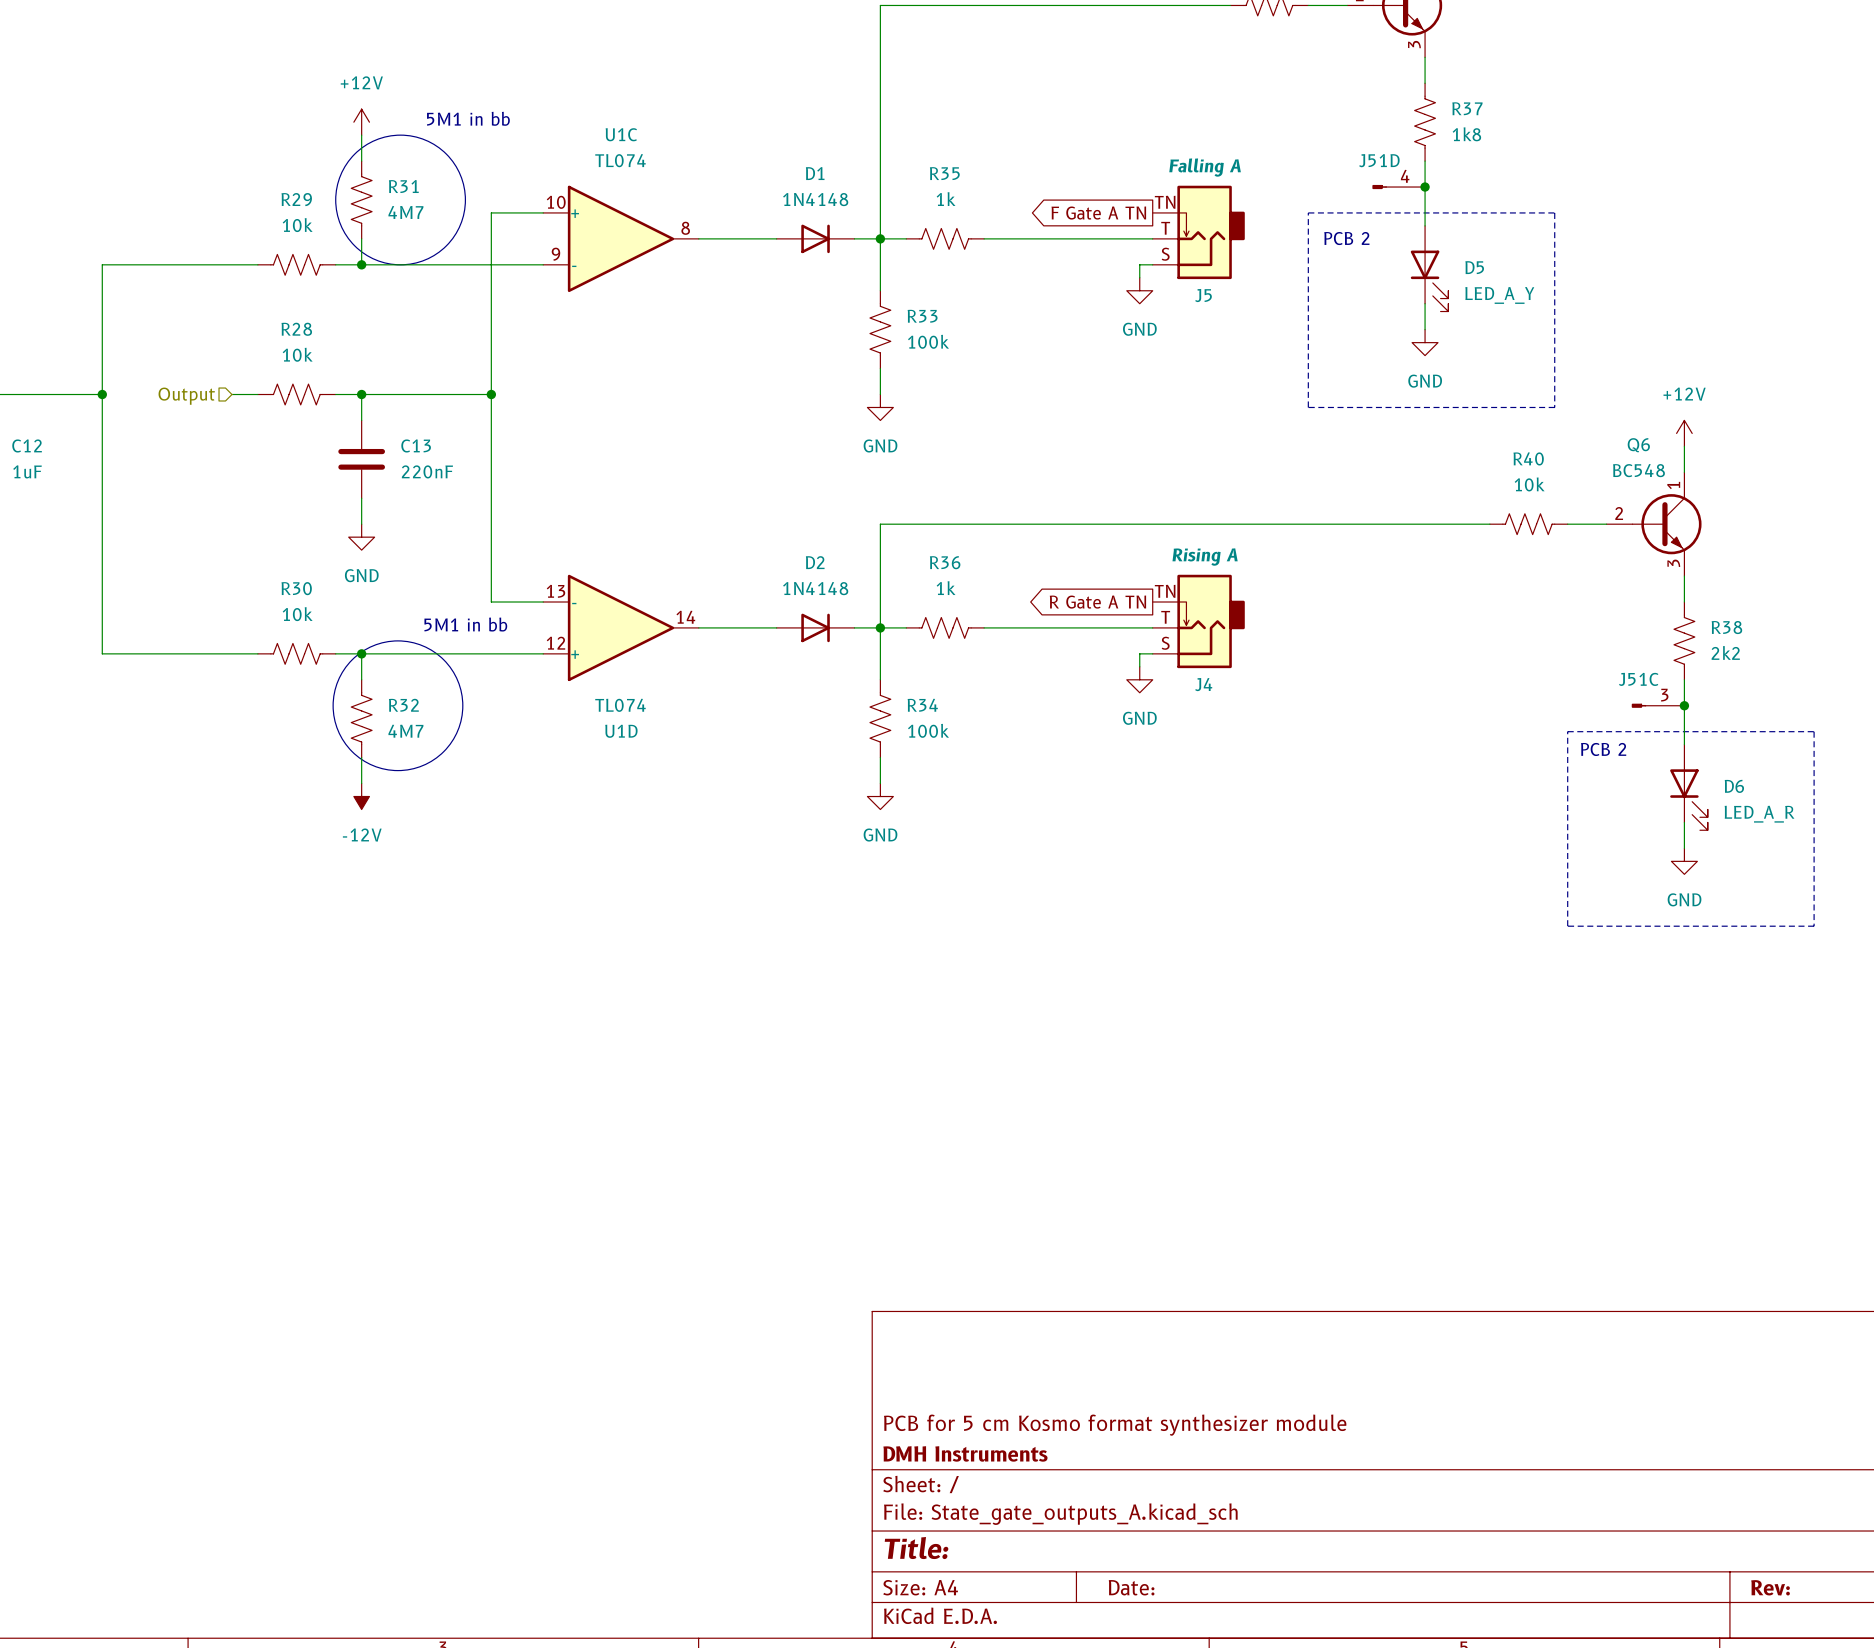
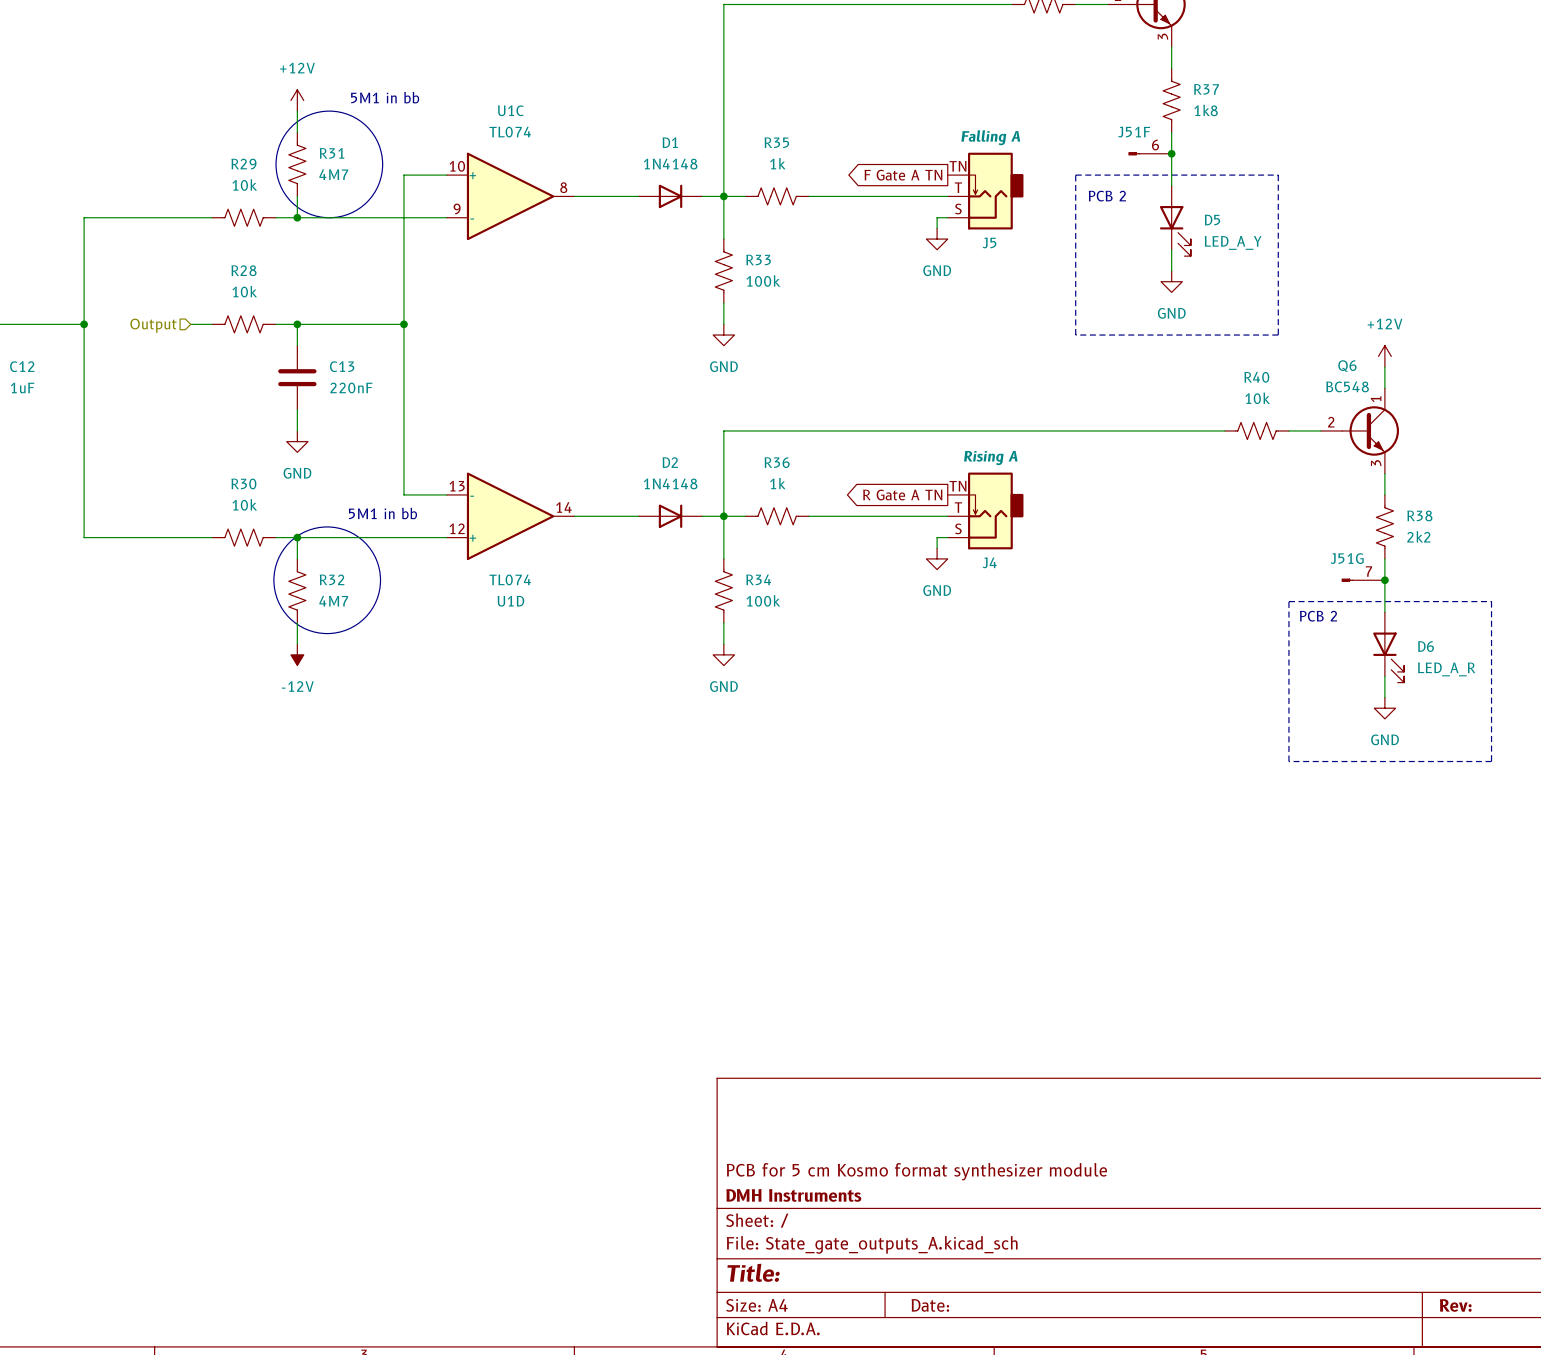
J51D name: J51D (1379, 160) -> J51F (1134, 132)
J51D pin number: 4 (1405, 176) -> 6 (1155, 145)
J51C name: J51C (1638, 679) -> J51G (1347, 558)
J51C pin number: 3 (1664, 695) -> 7 (1368, 571)

